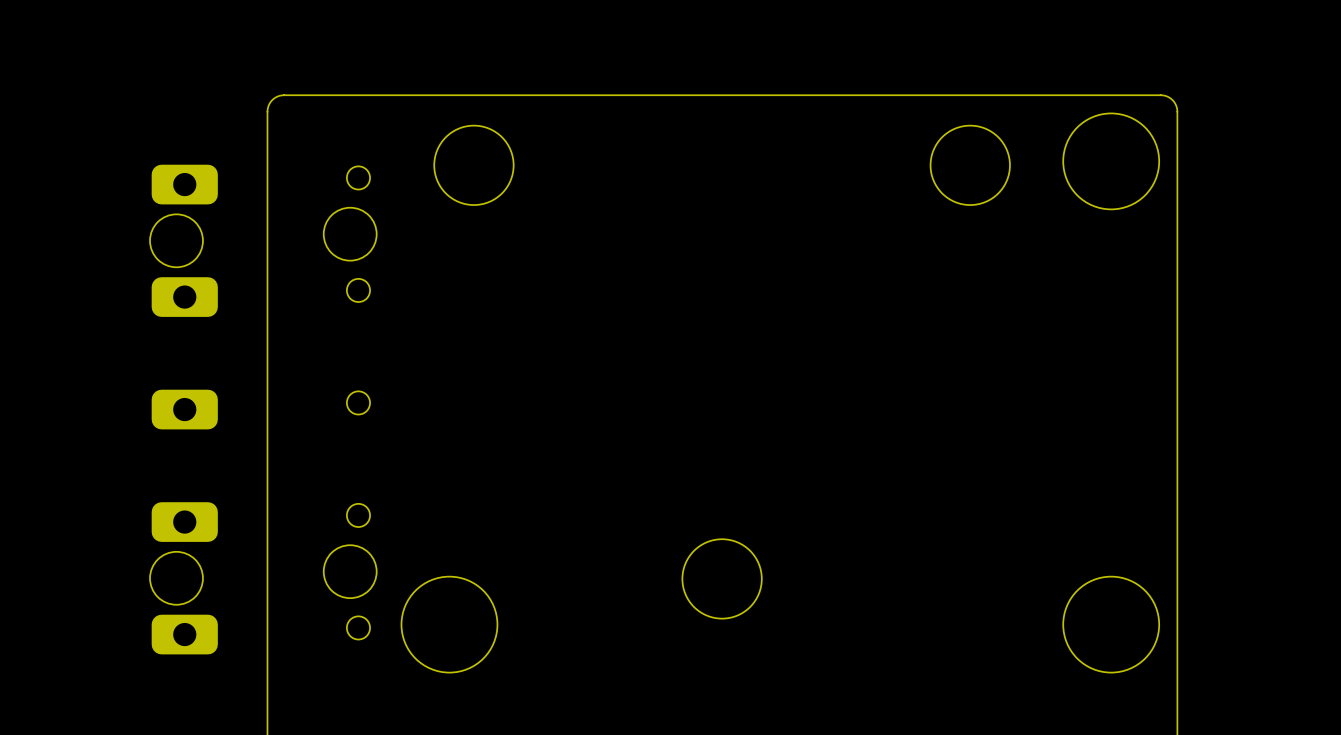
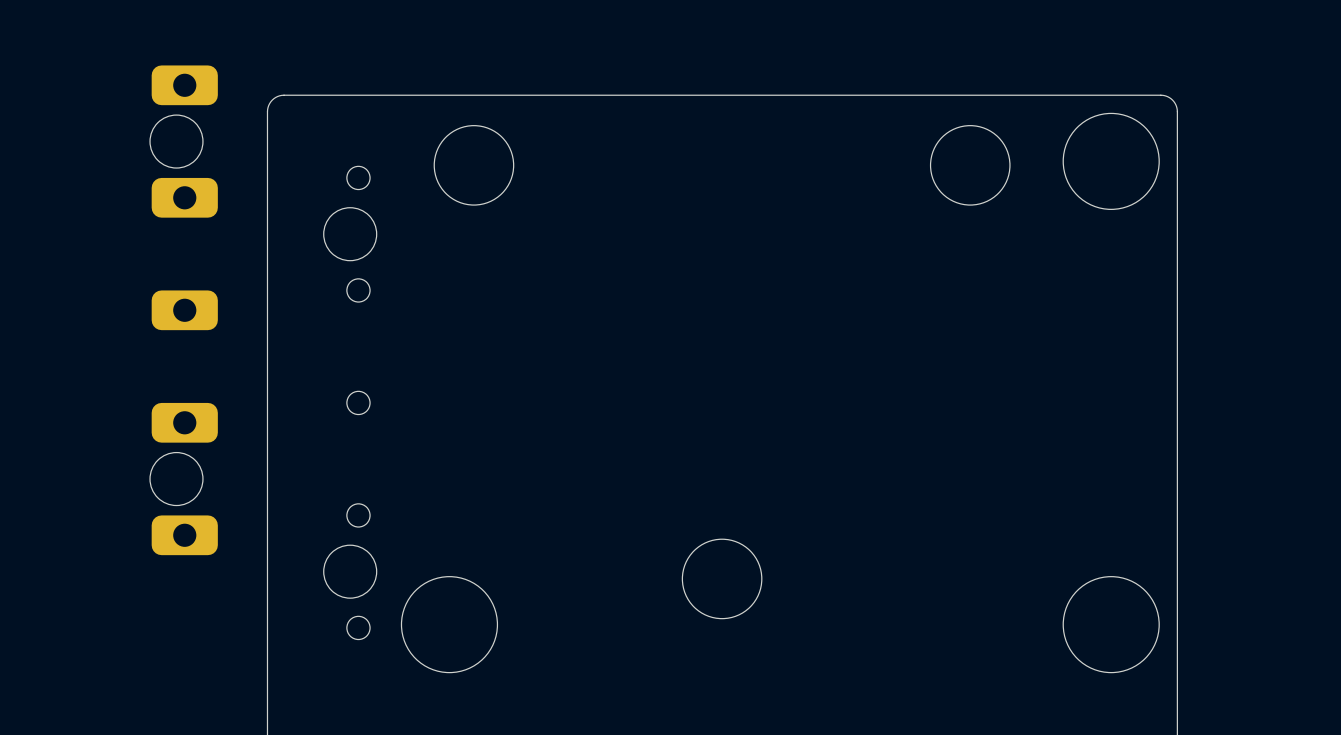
part position: (183, 409) -> (183, 310)

